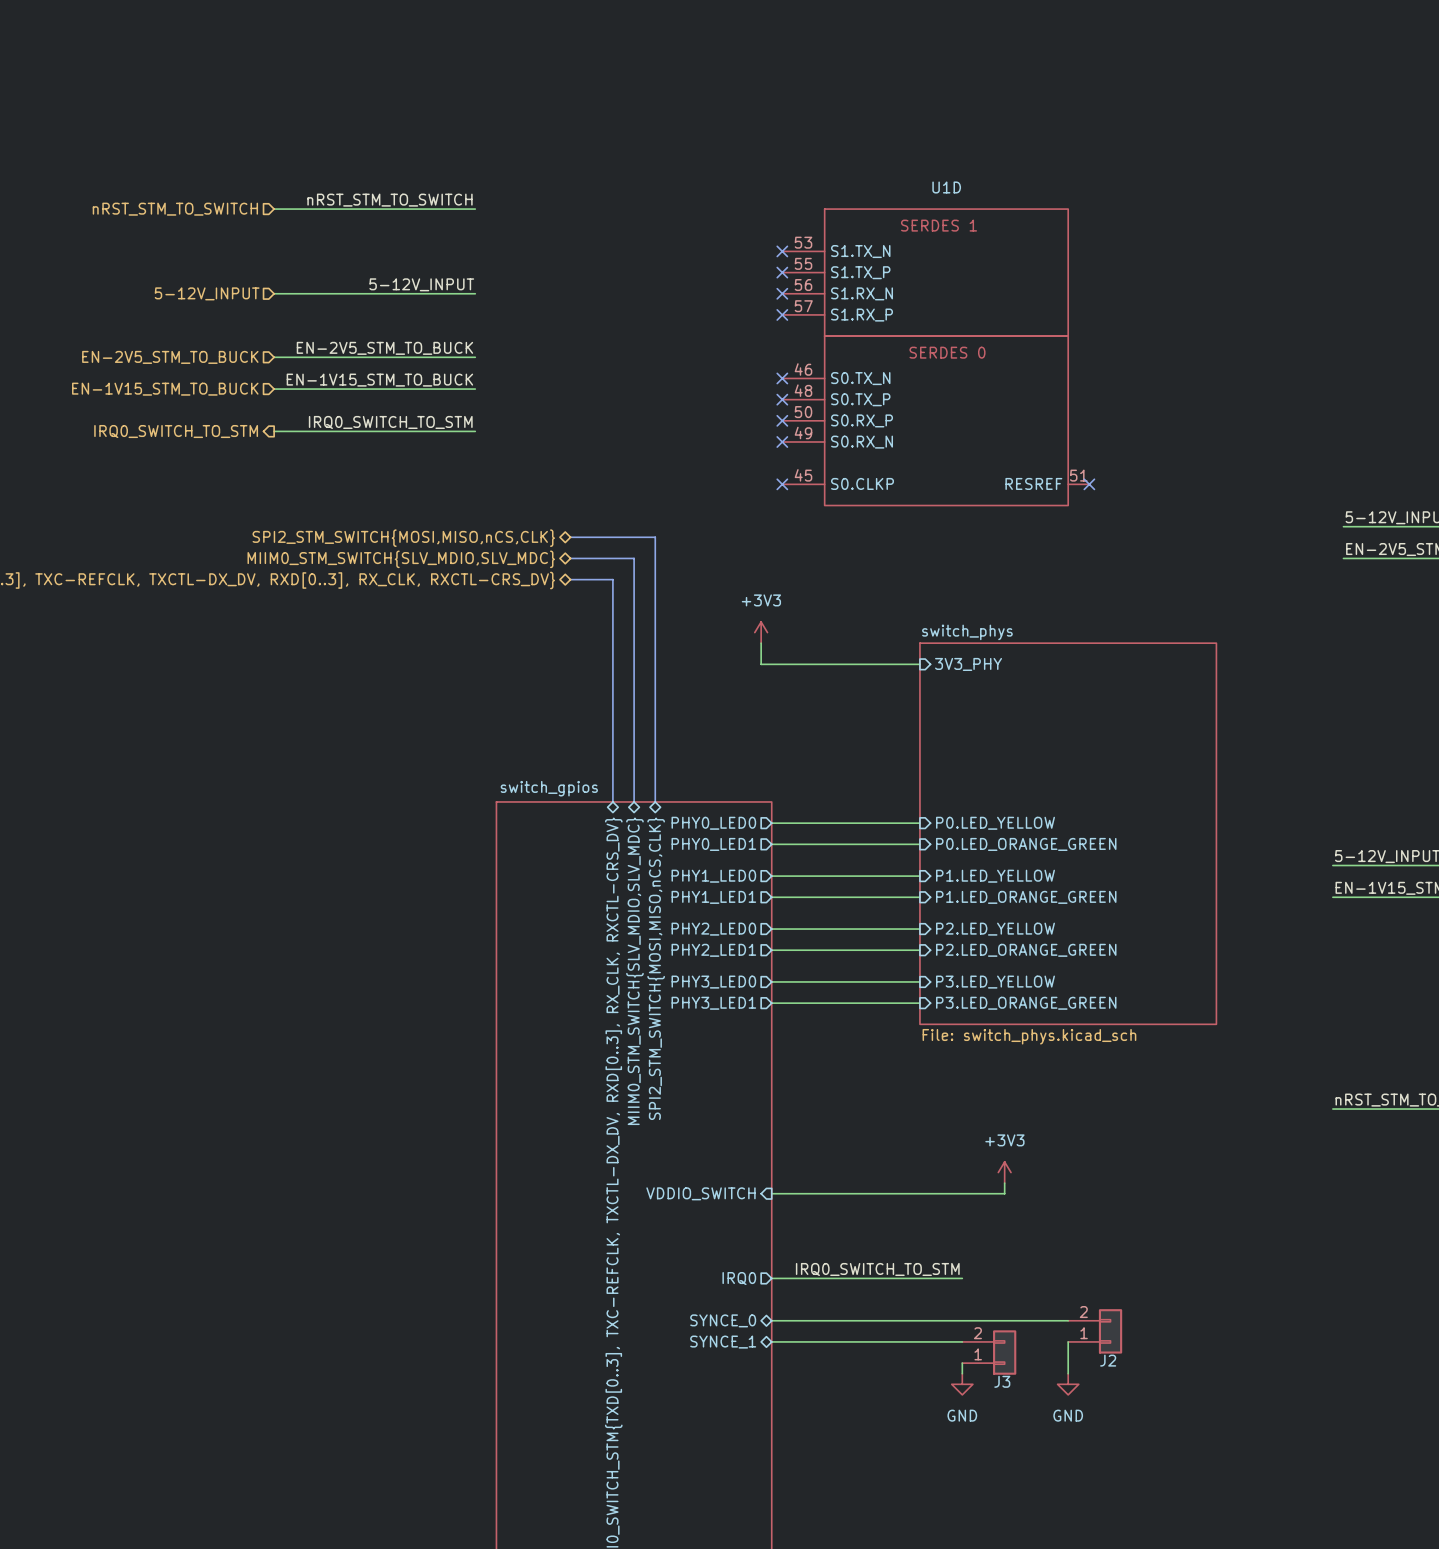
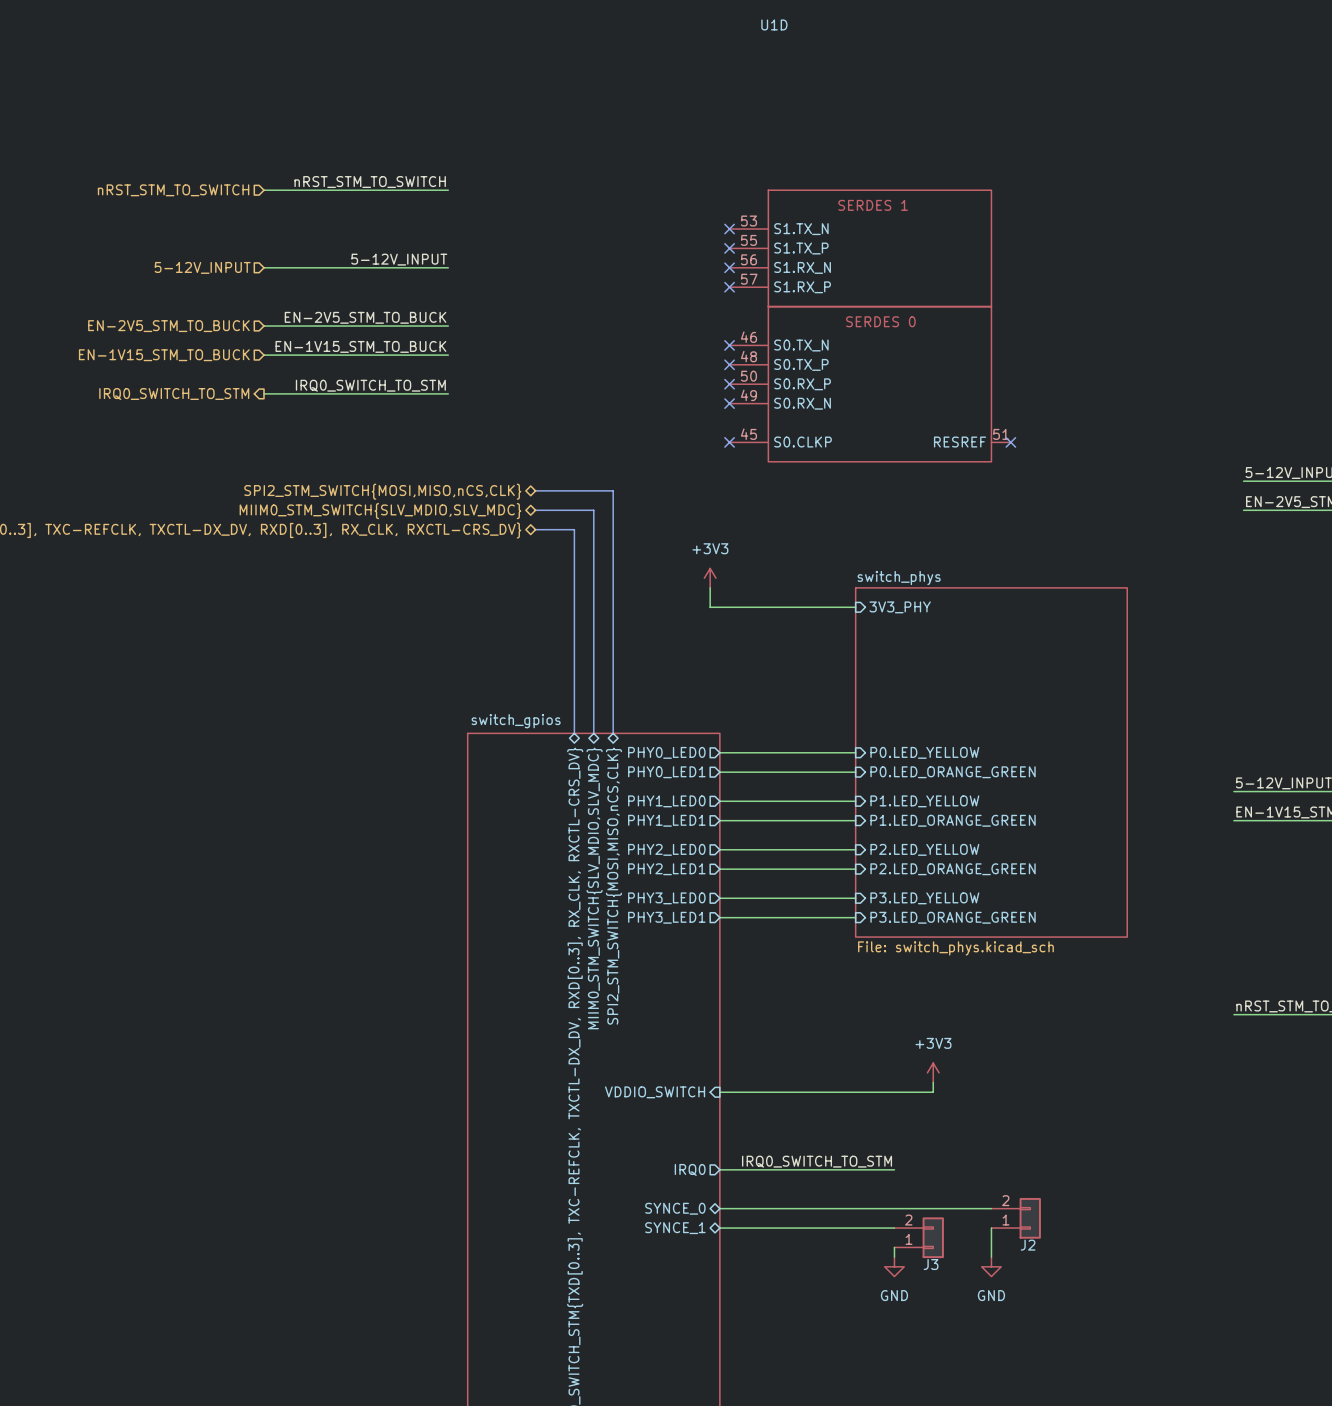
U1D name position: U1D (946, 187) -> U1D (774, 24)

